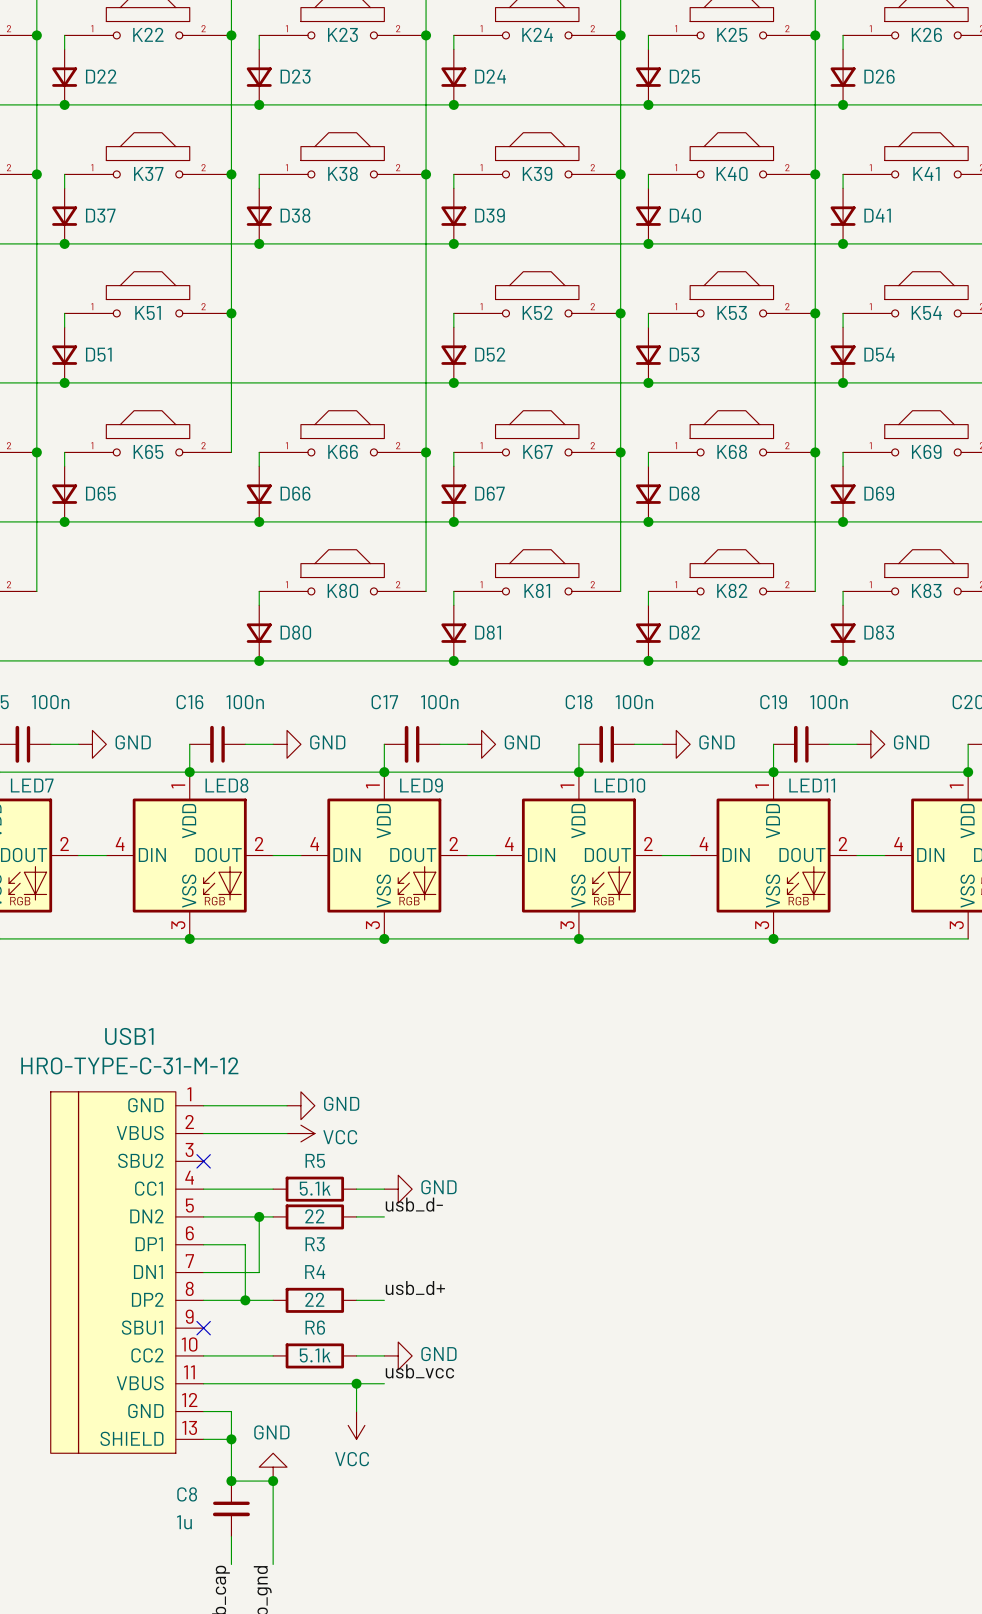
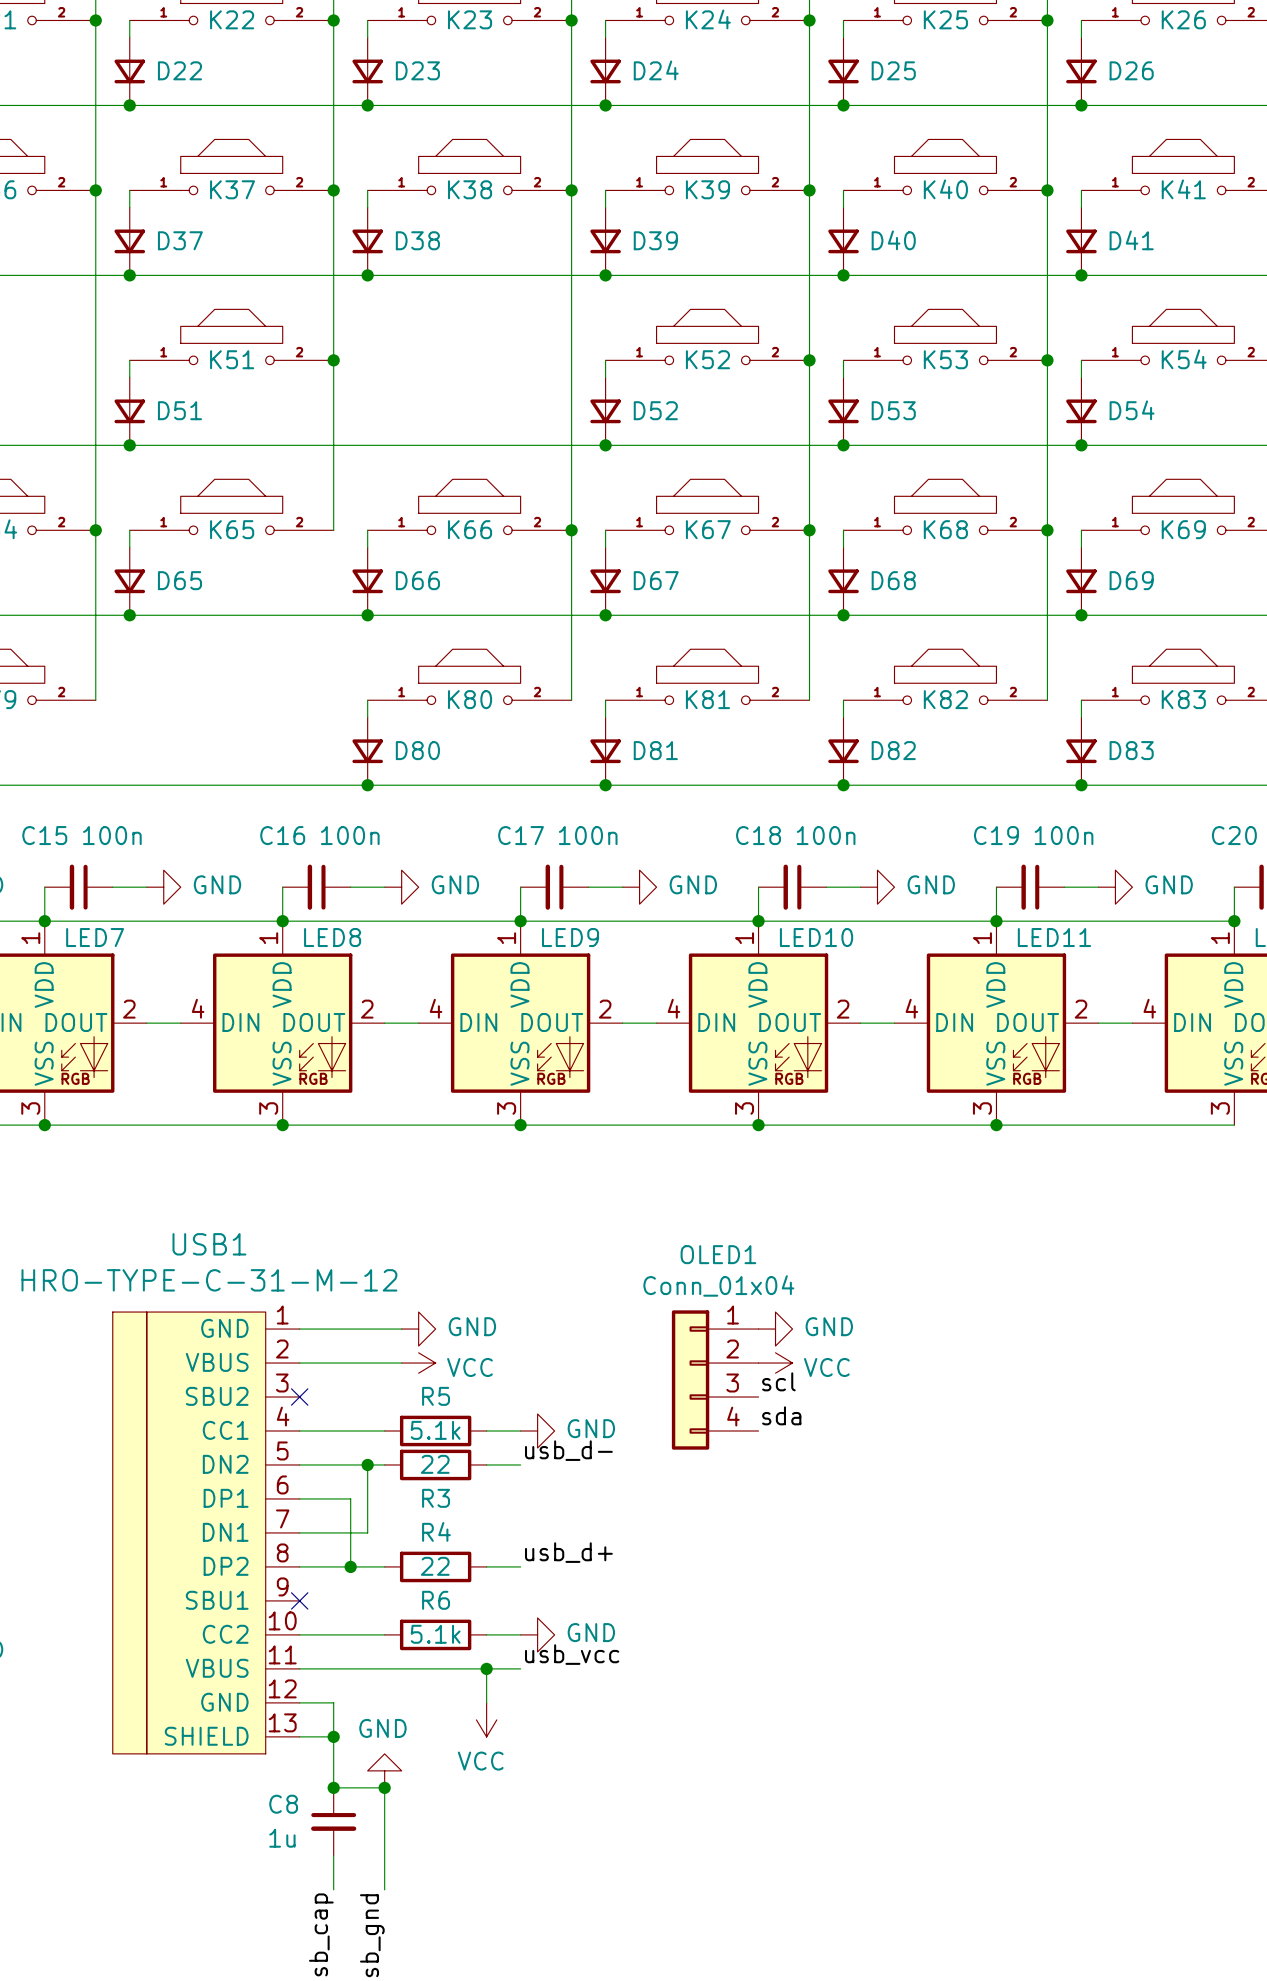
power symbol: none -> GND (775, 1329)
power symbol: none -> VCC (775, 1363)
OLED1: none -> Conn_01x04 (715, 1380)
label: none -> scl (778, 1381)
label: none -> sda (781, 1415)

